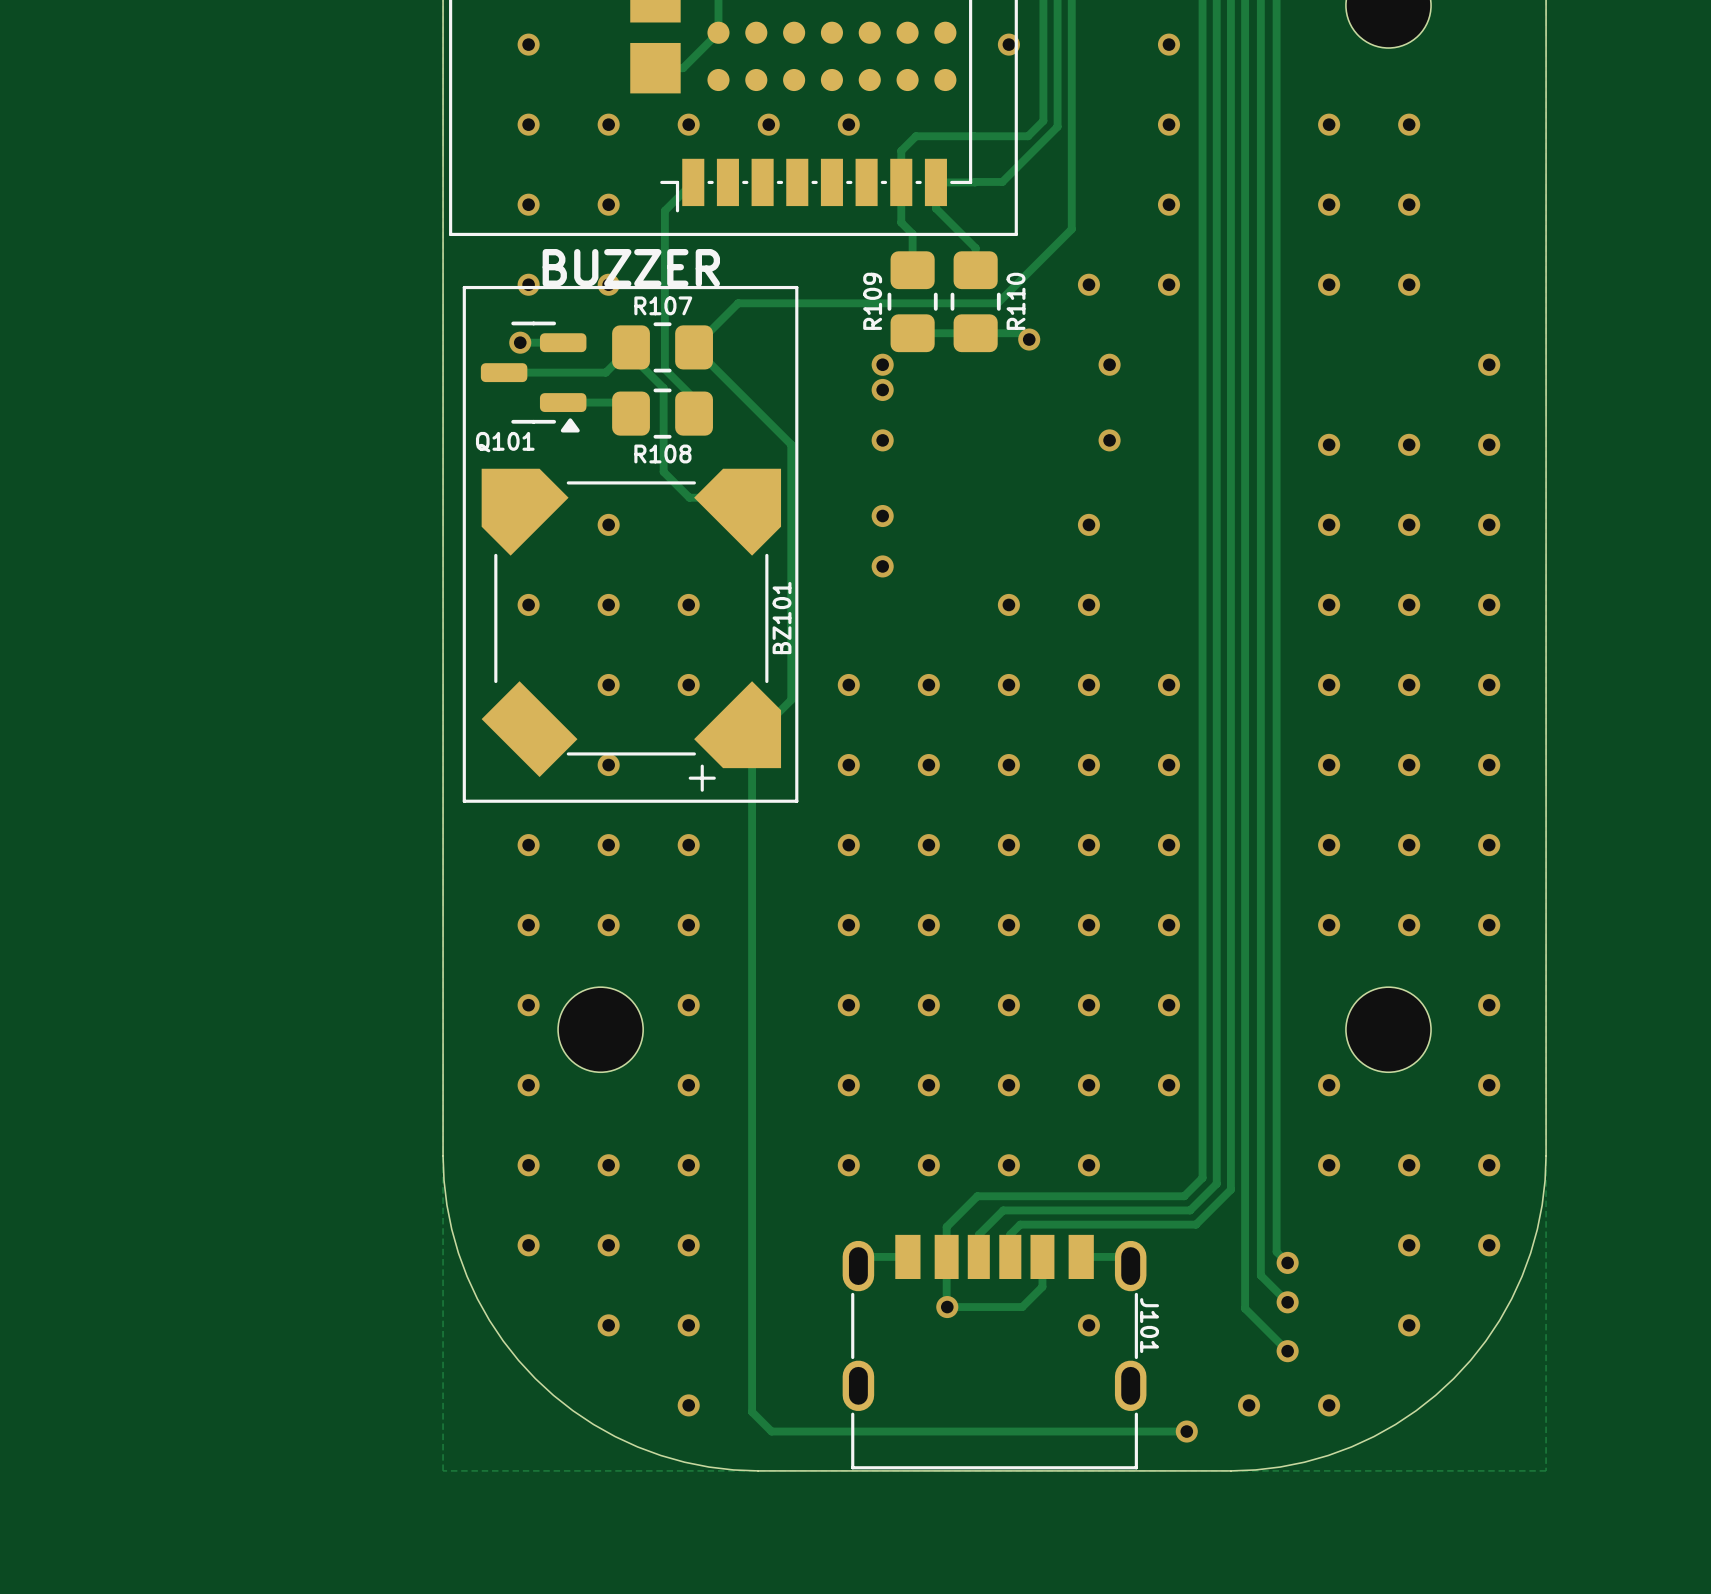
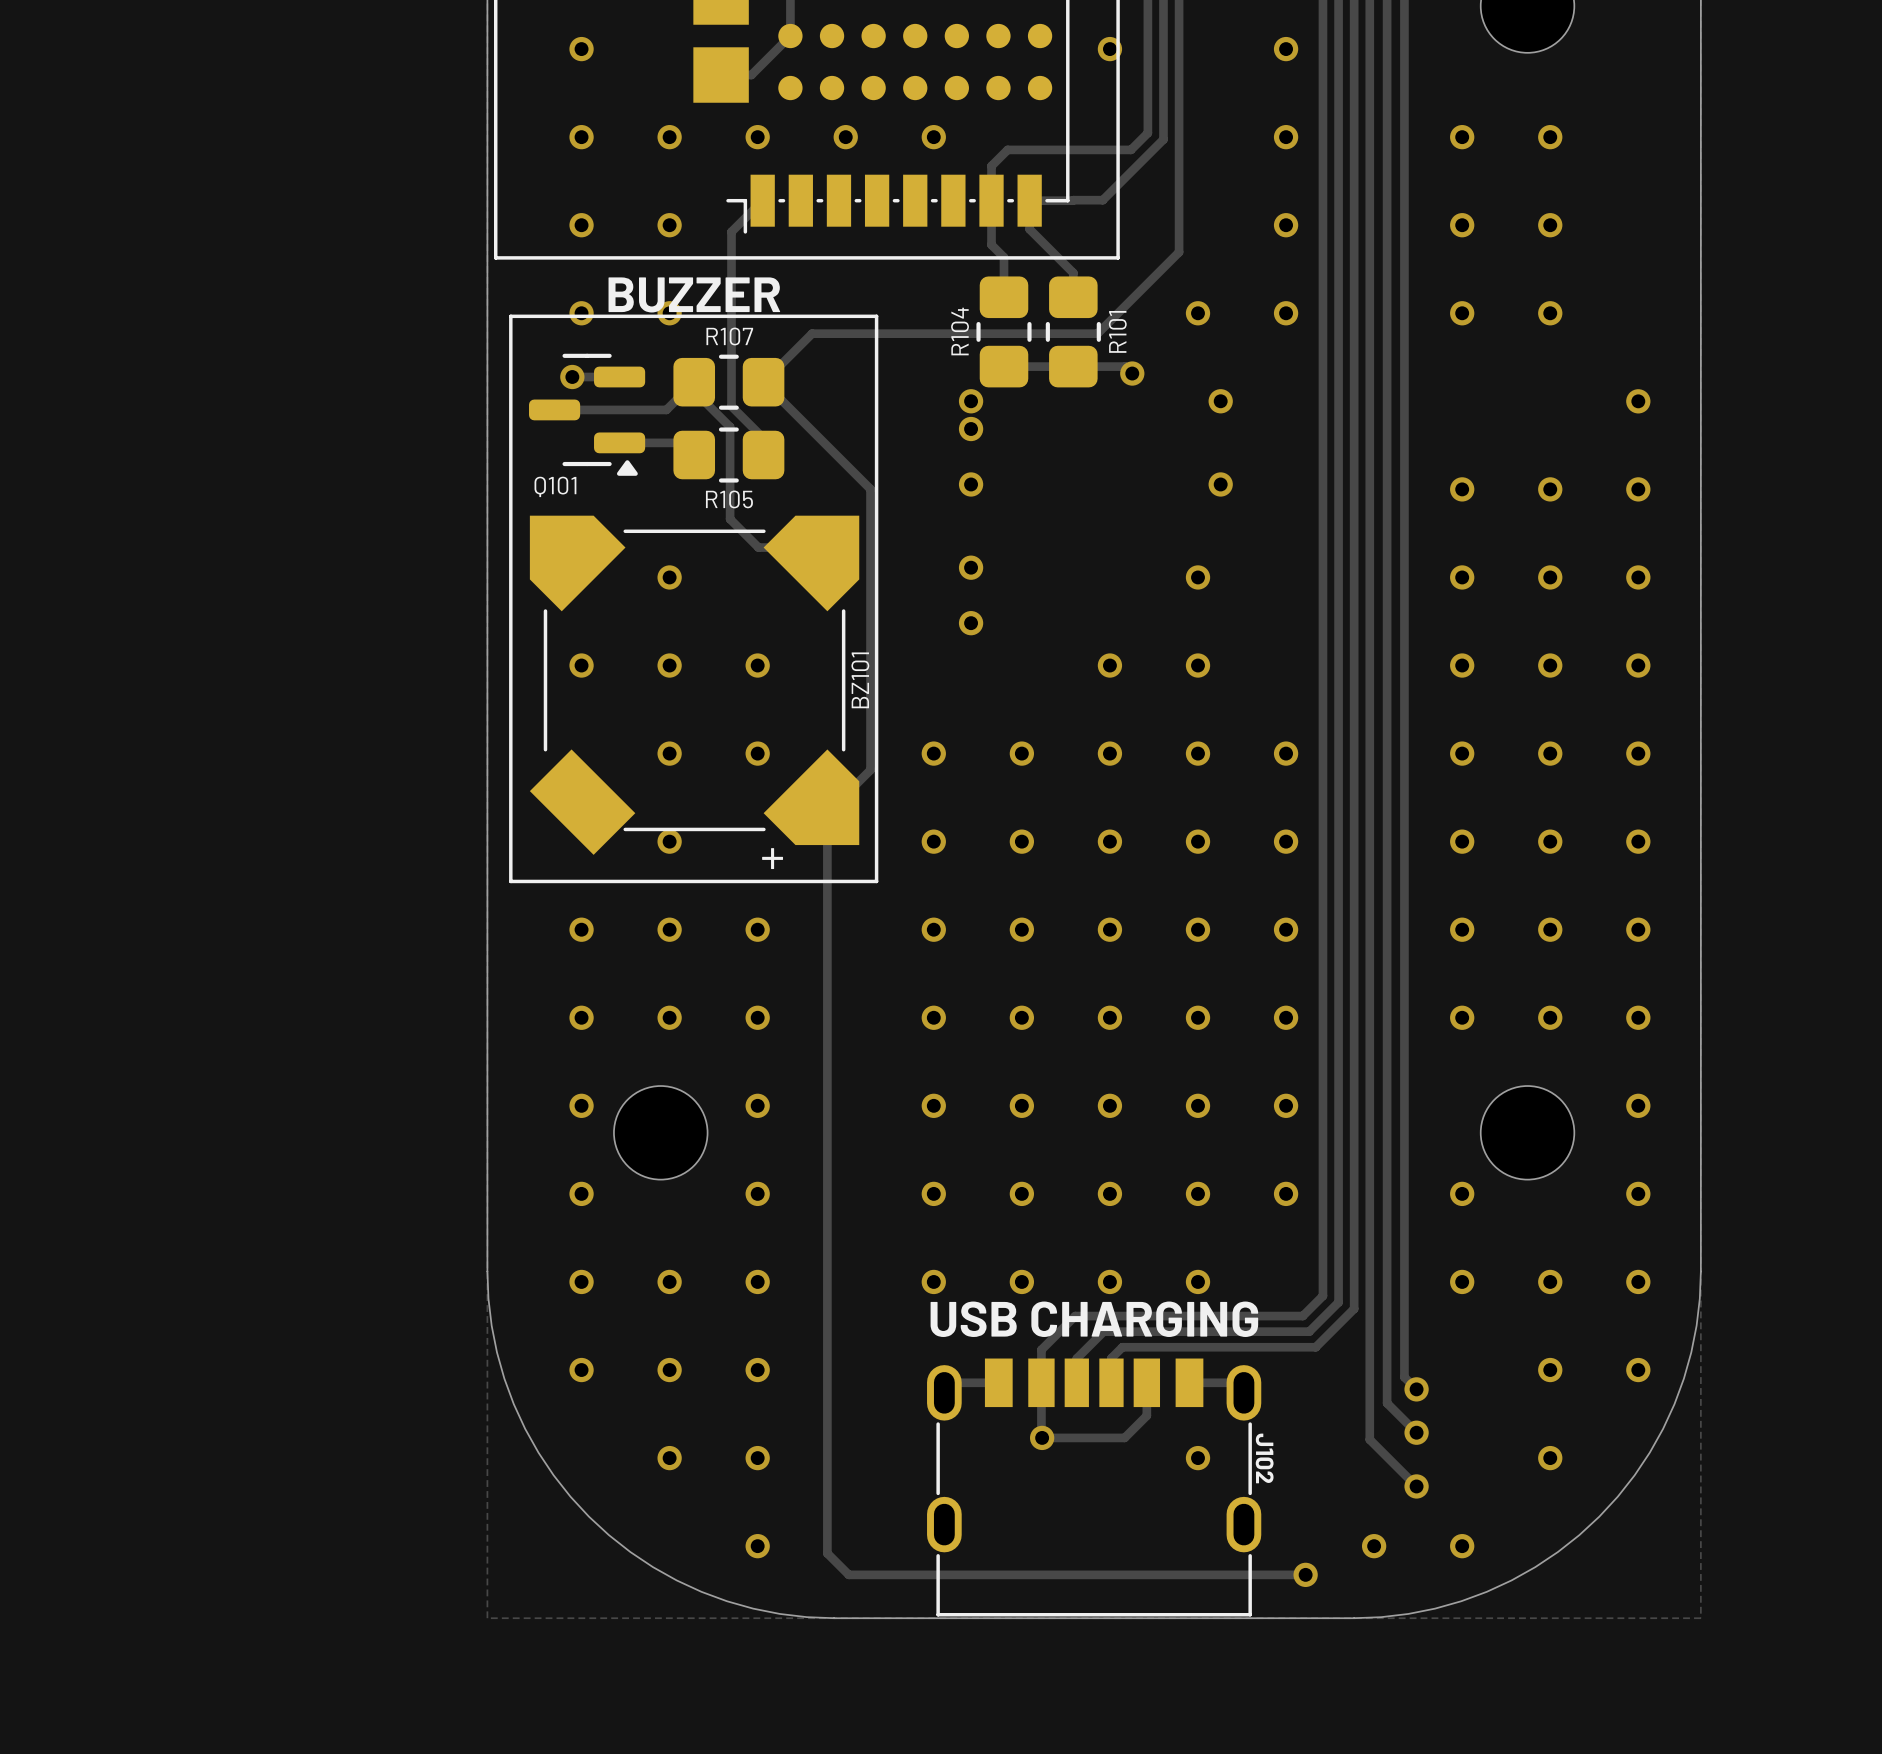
R109 name: R109 (872, 301) -> R104 (960, 331)
R110 name: R110 (1016, 301) -> R101 (1117, 331)
R108 name: R108 (662, 453) -> R105 (729, 499)
text: none -> USB CHARGING (1094, 1319)
J101 name: J101 (1149, 1325) -> J102 (1264, 1458)

